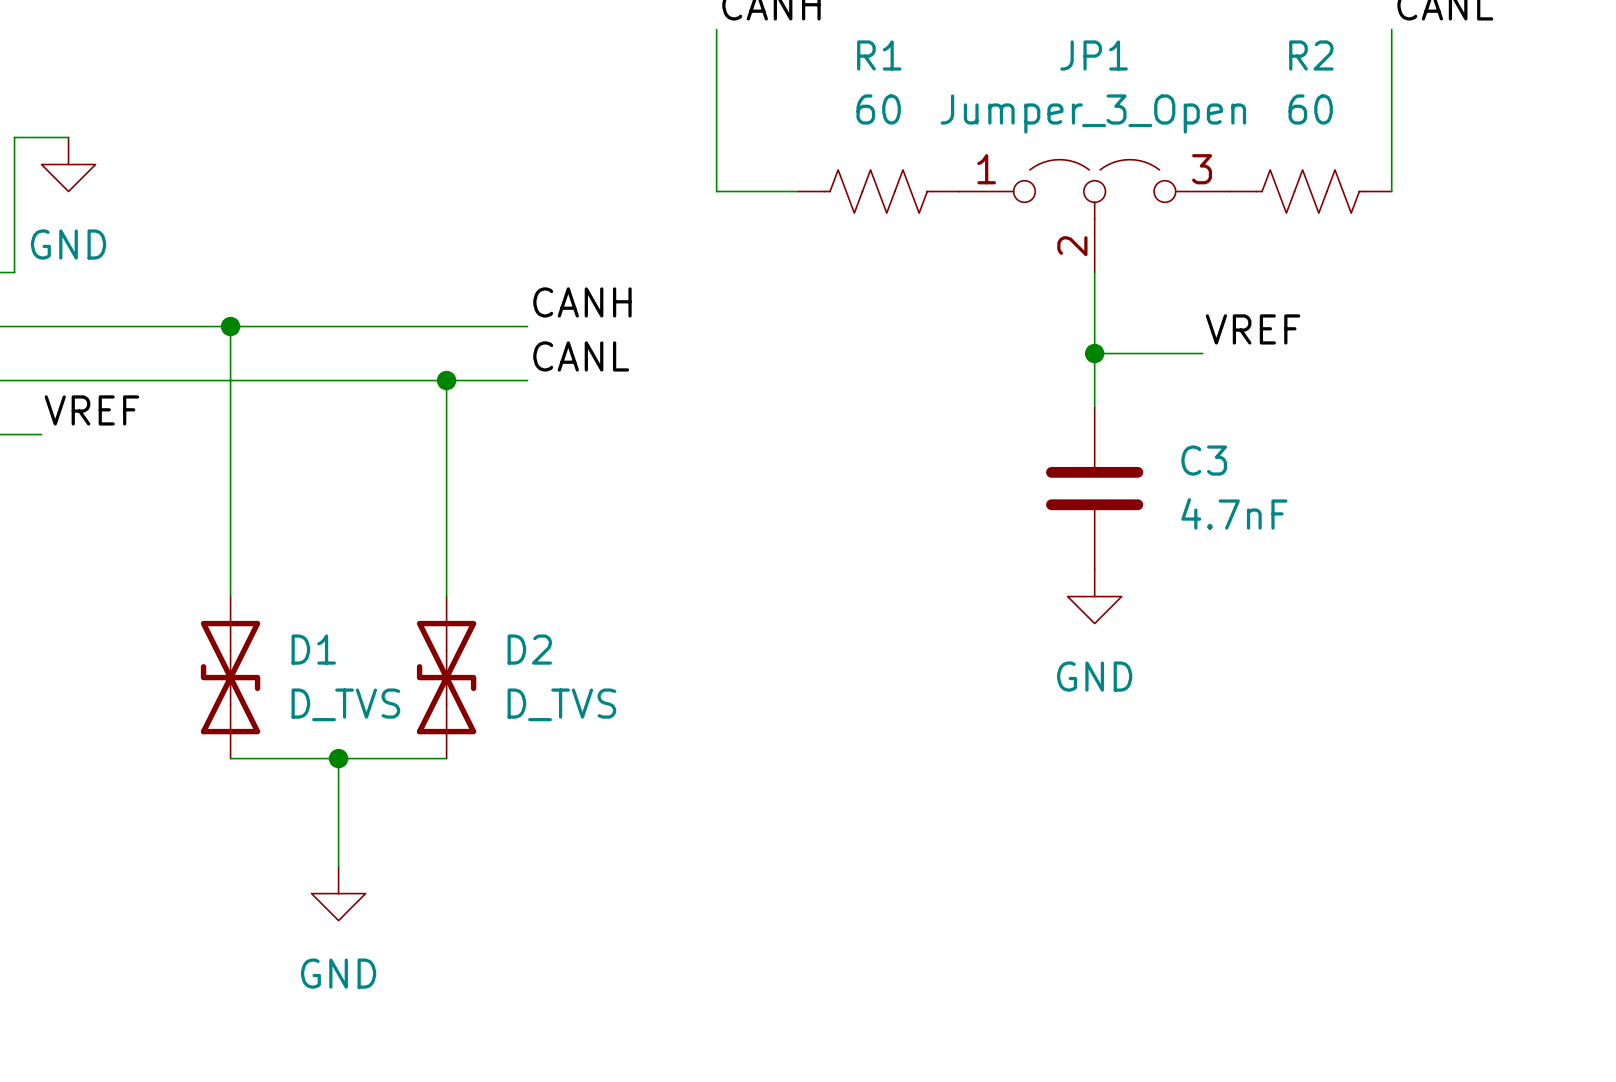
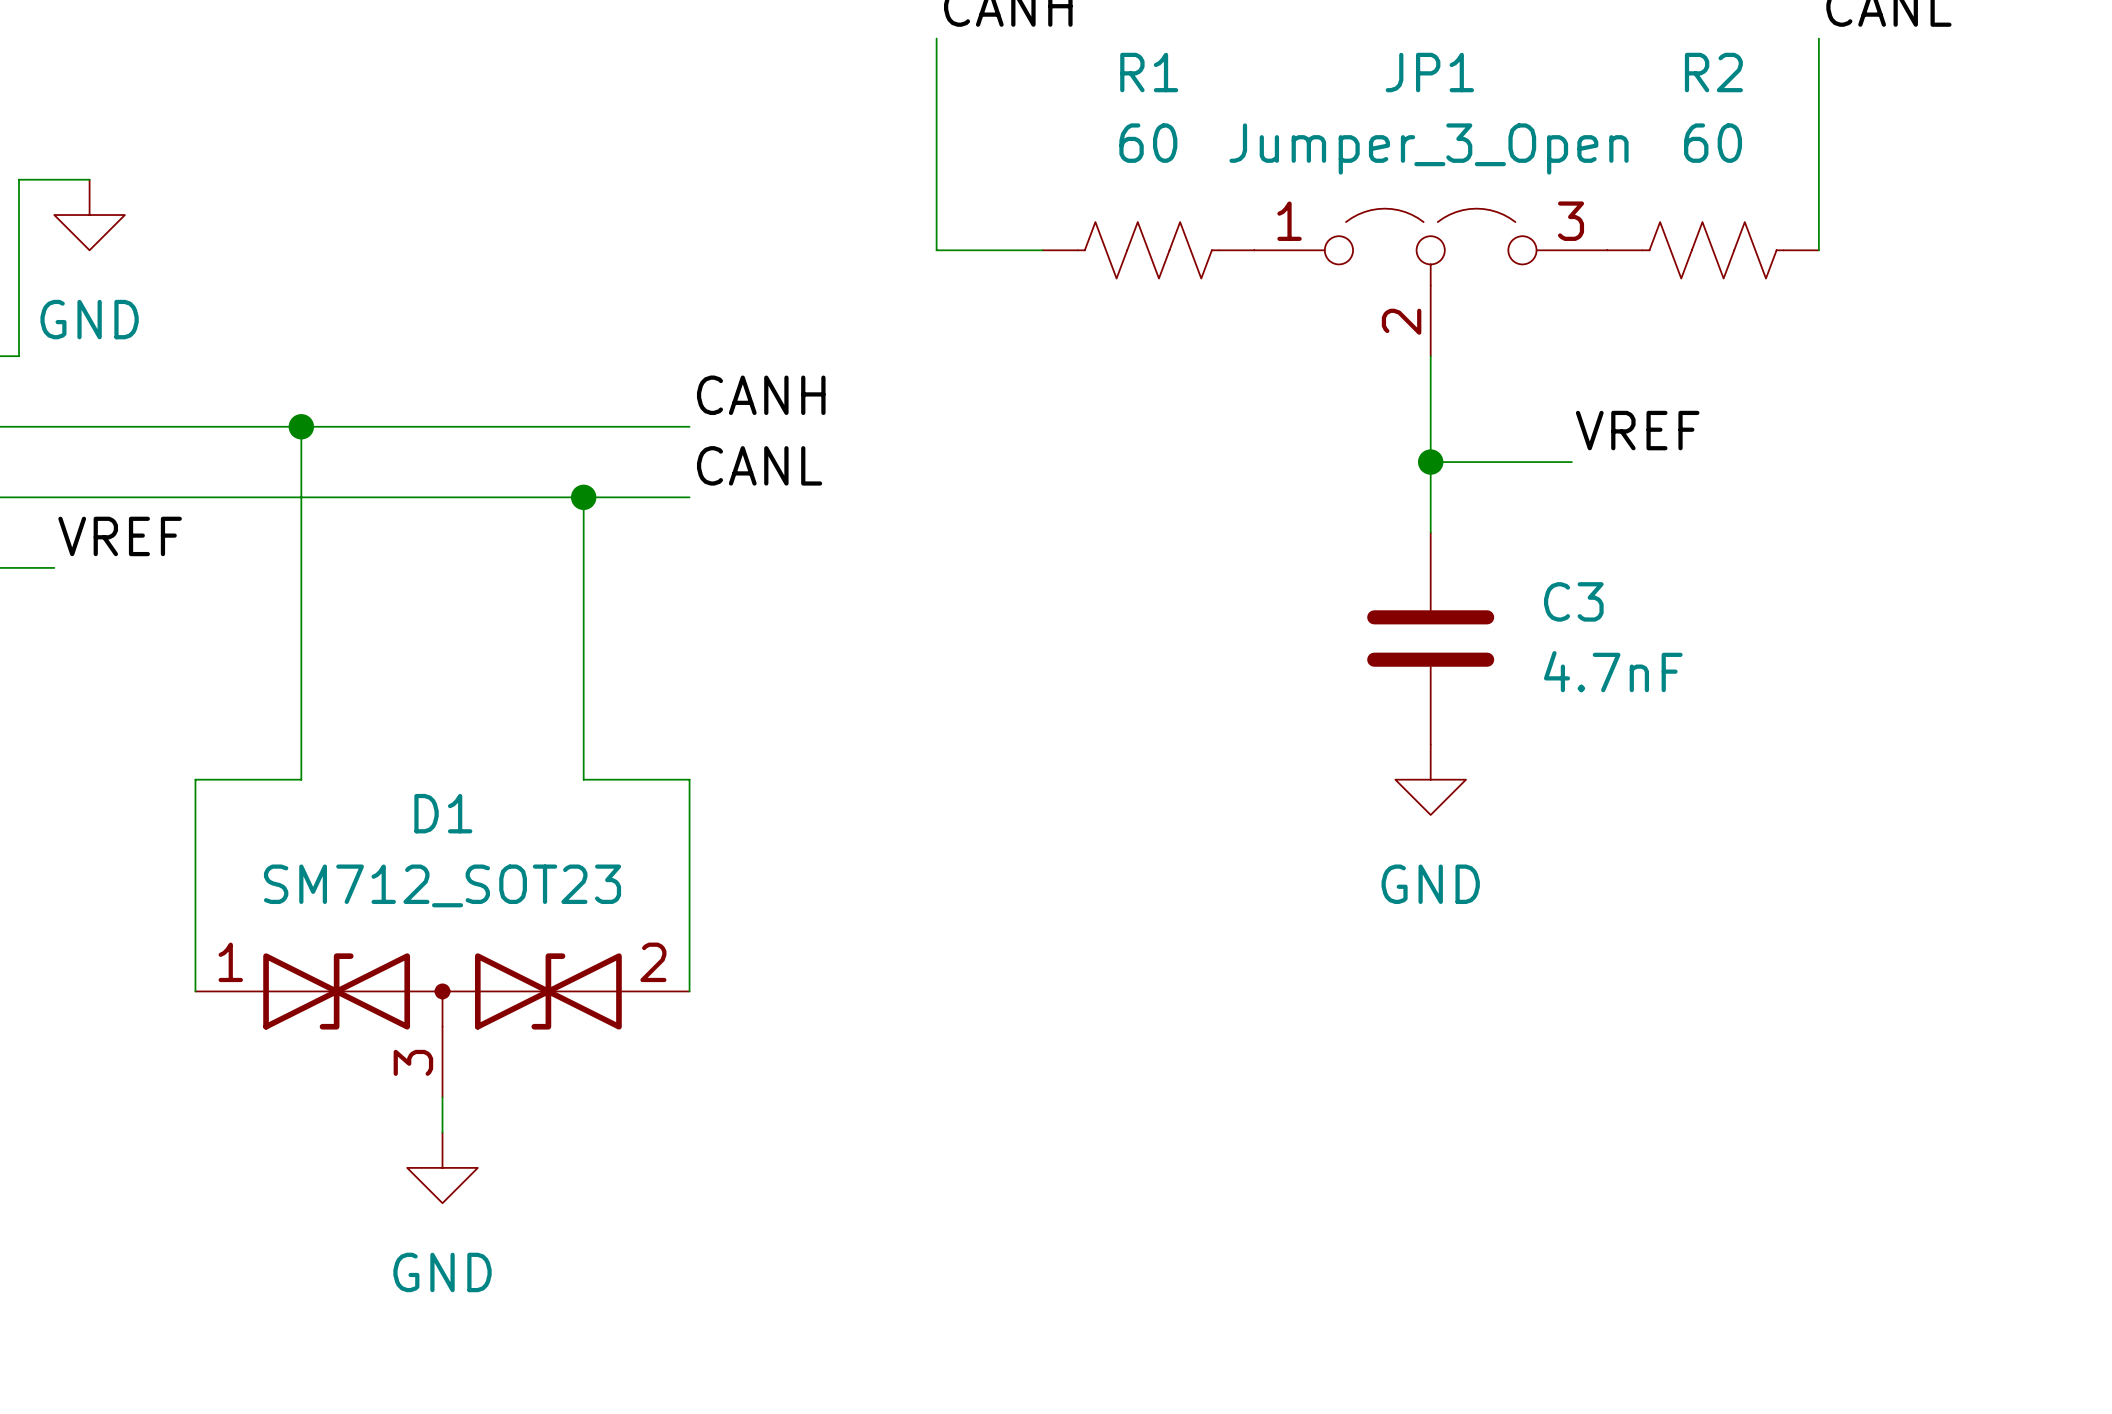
D1 symbol: [200, 596, 261, 759] -> [195, 953, 690, 1098]
wire: none -> (301, 779) (195, 779) (195, 991)
wire: none -> (583, 779) (689, 779) (689, 991)
D1 name position: D1 (313, 649) -> D1 (443, 813)
D2: D_TVS (446, 677) -> none
D1 value: D_TVS (345, 704) -> SM712_SOT23 (442, 885)
junction: (338, 758) -> none

